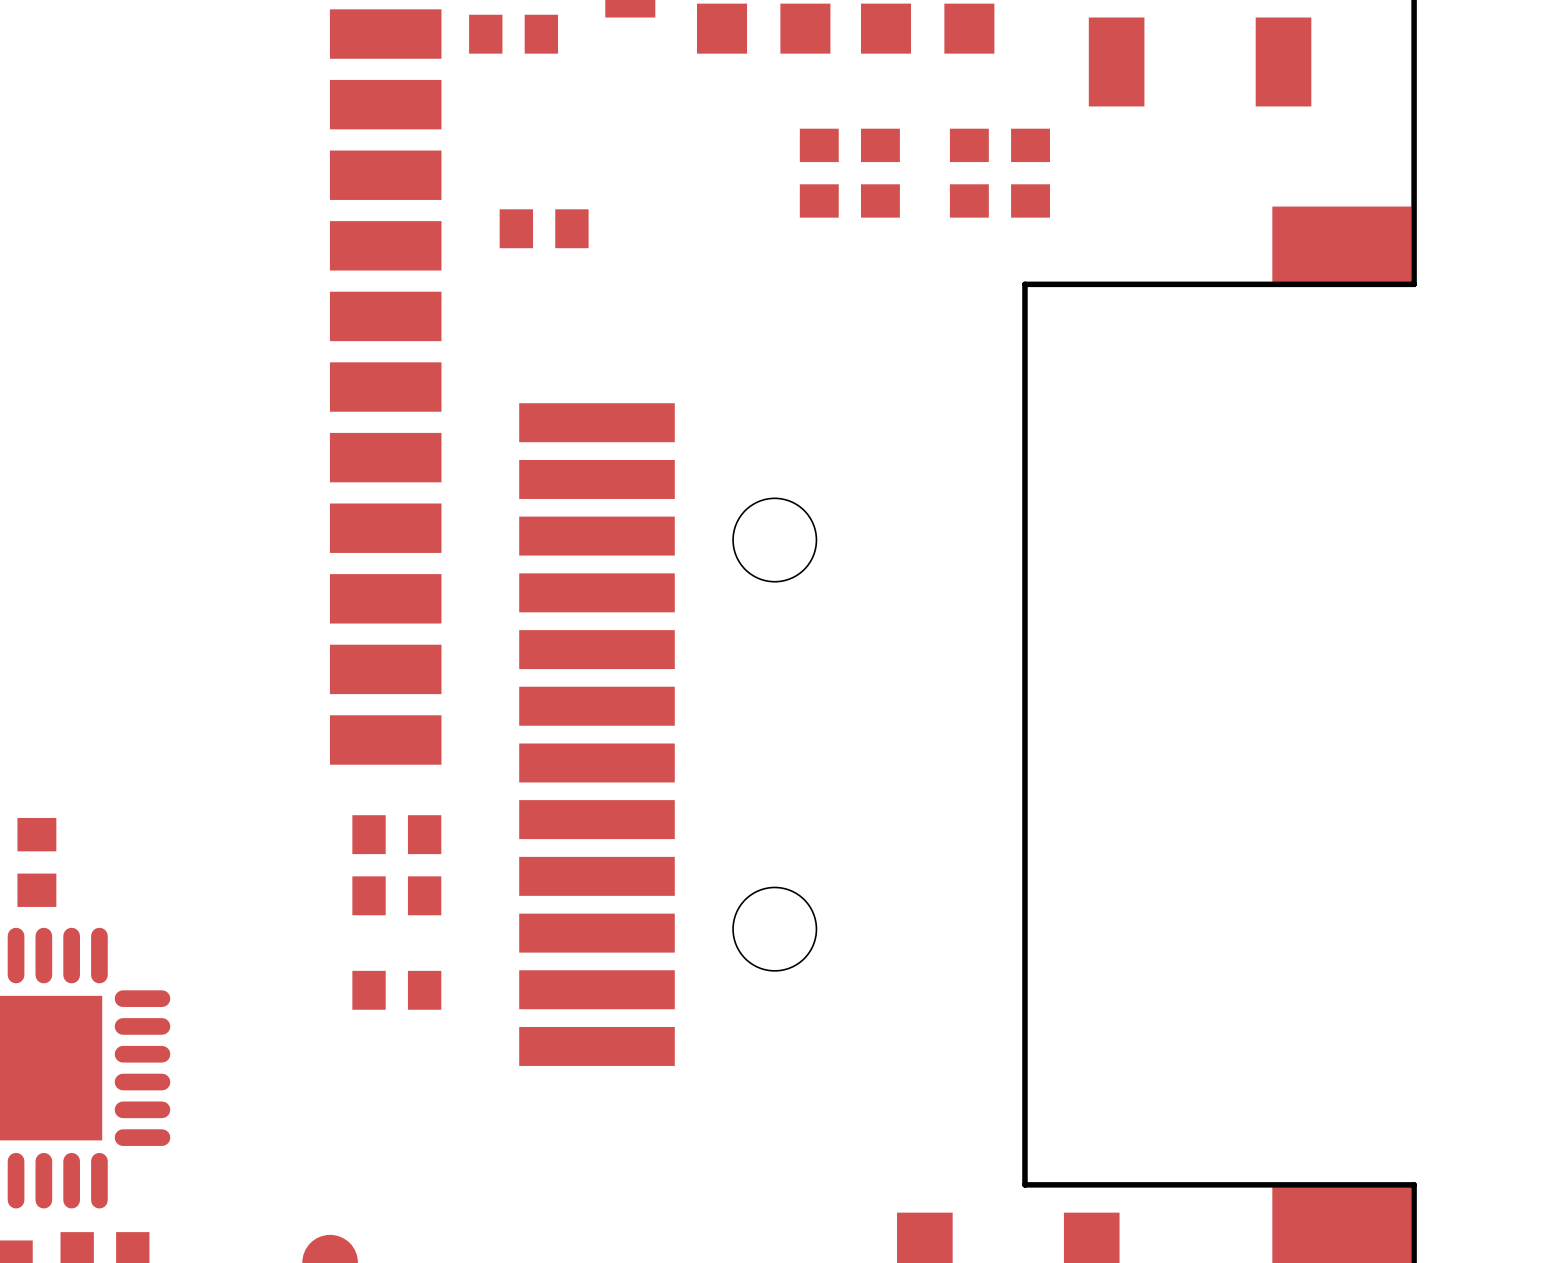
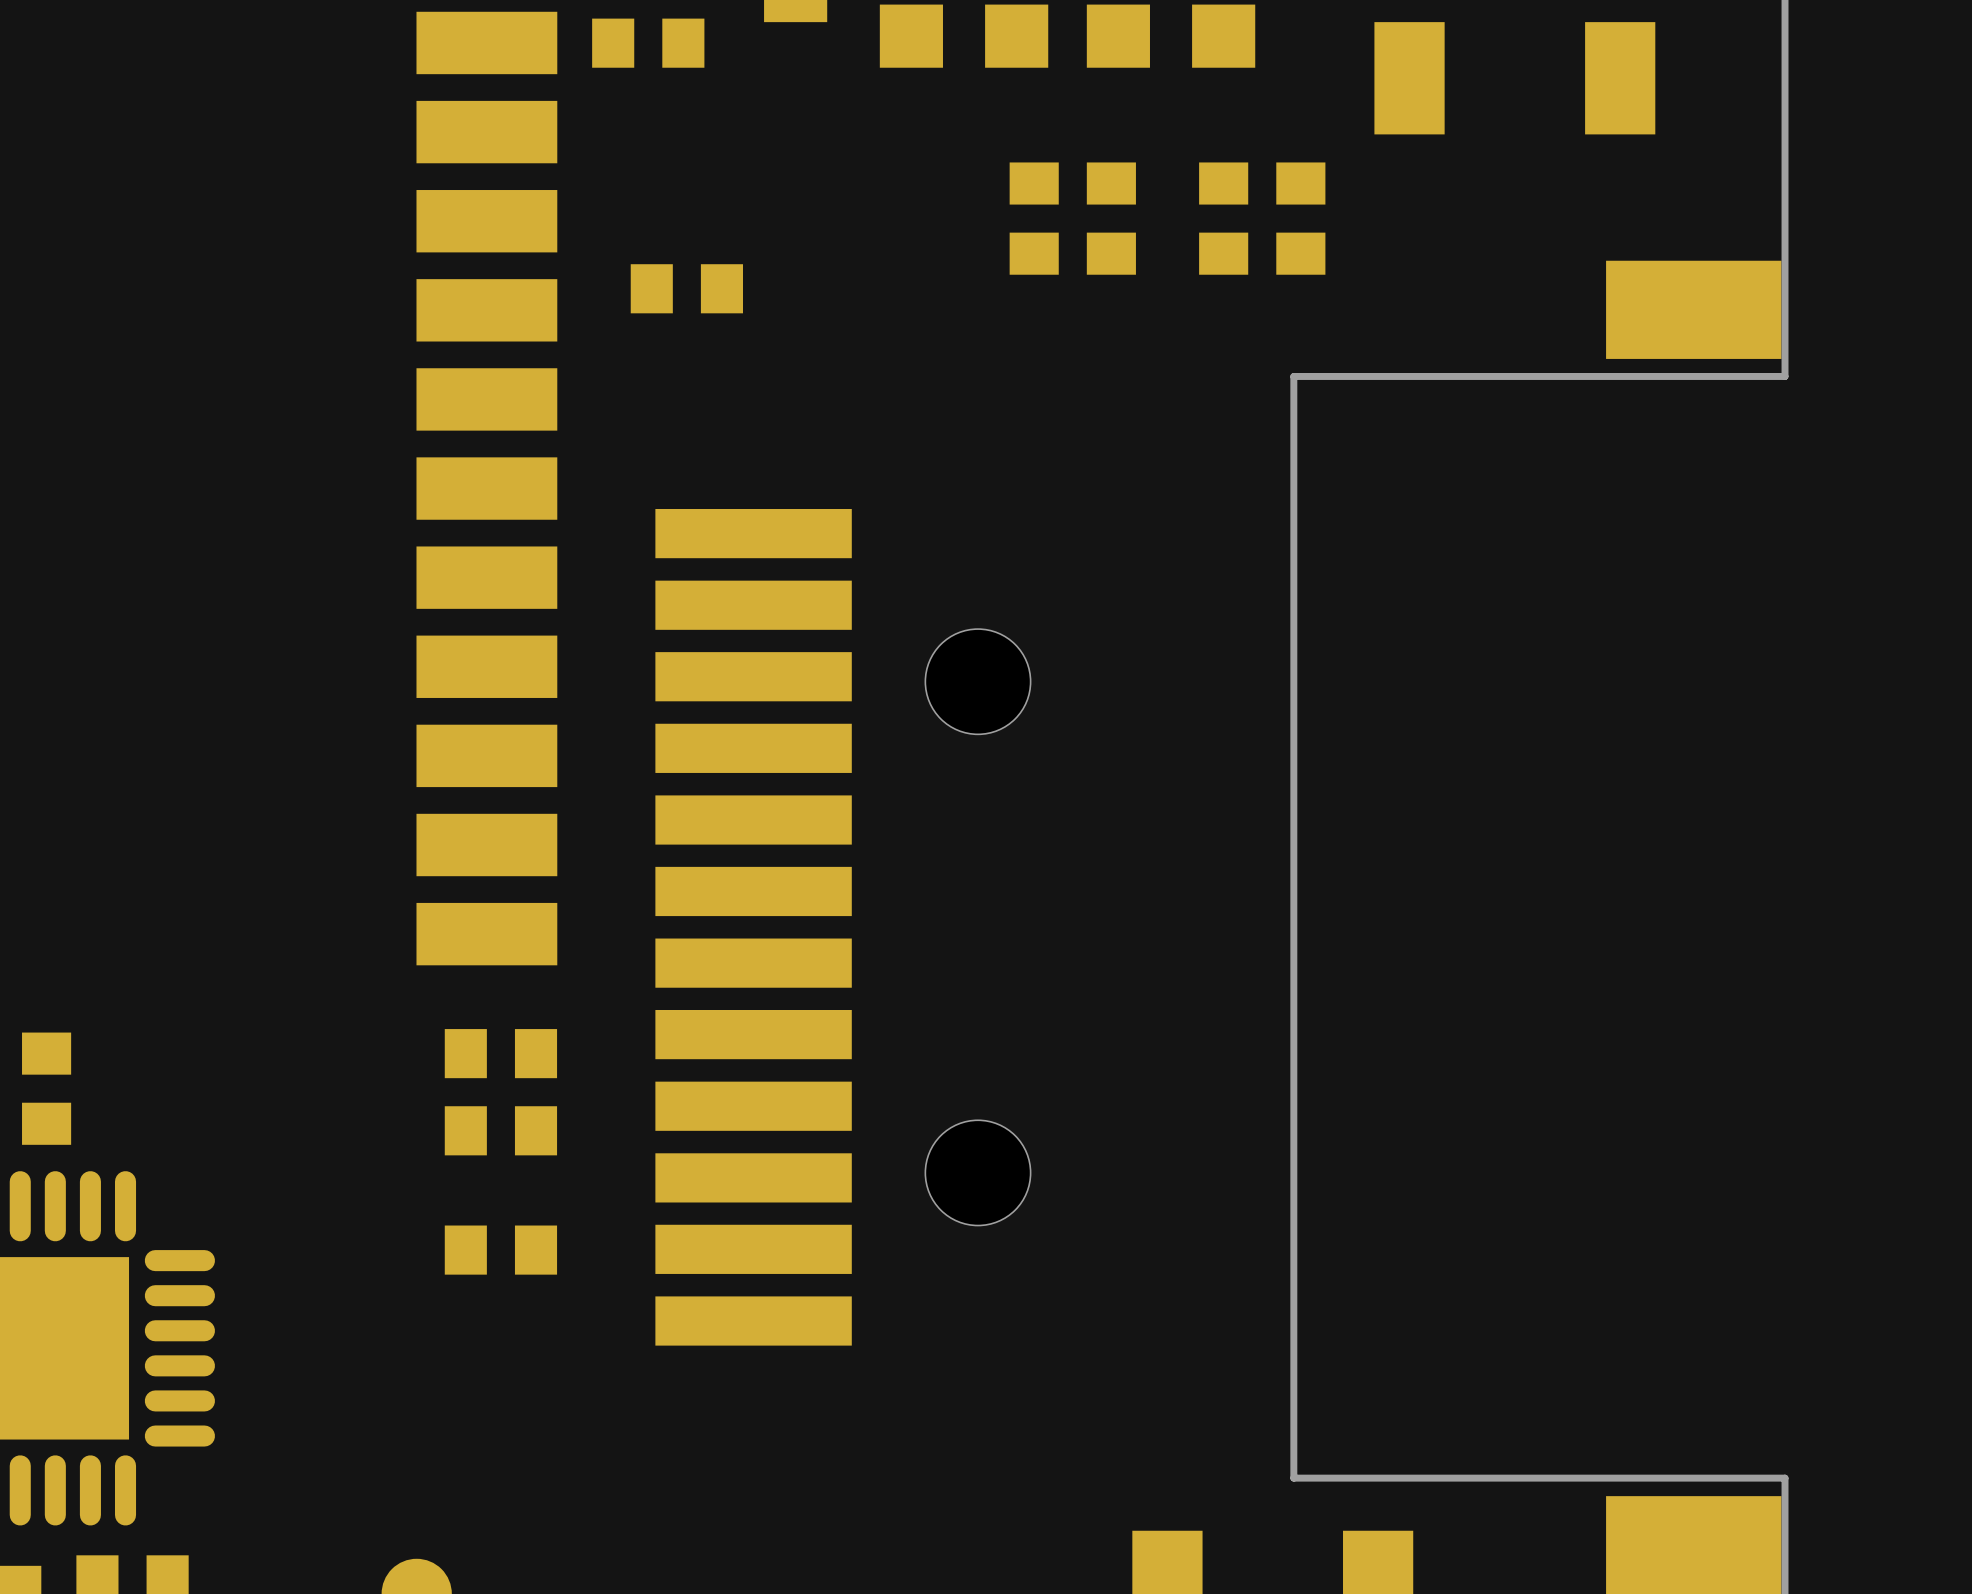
board edge: (1414, 284) (1024, 284) (1024, 298) -> (1785, 358) (1785, 376) (1293, 376)
board edge: (1024, 1170) (1024, 1184) (1414, 1184) -> (1293, 1478) (1785, 1478) (1785, 1495)

